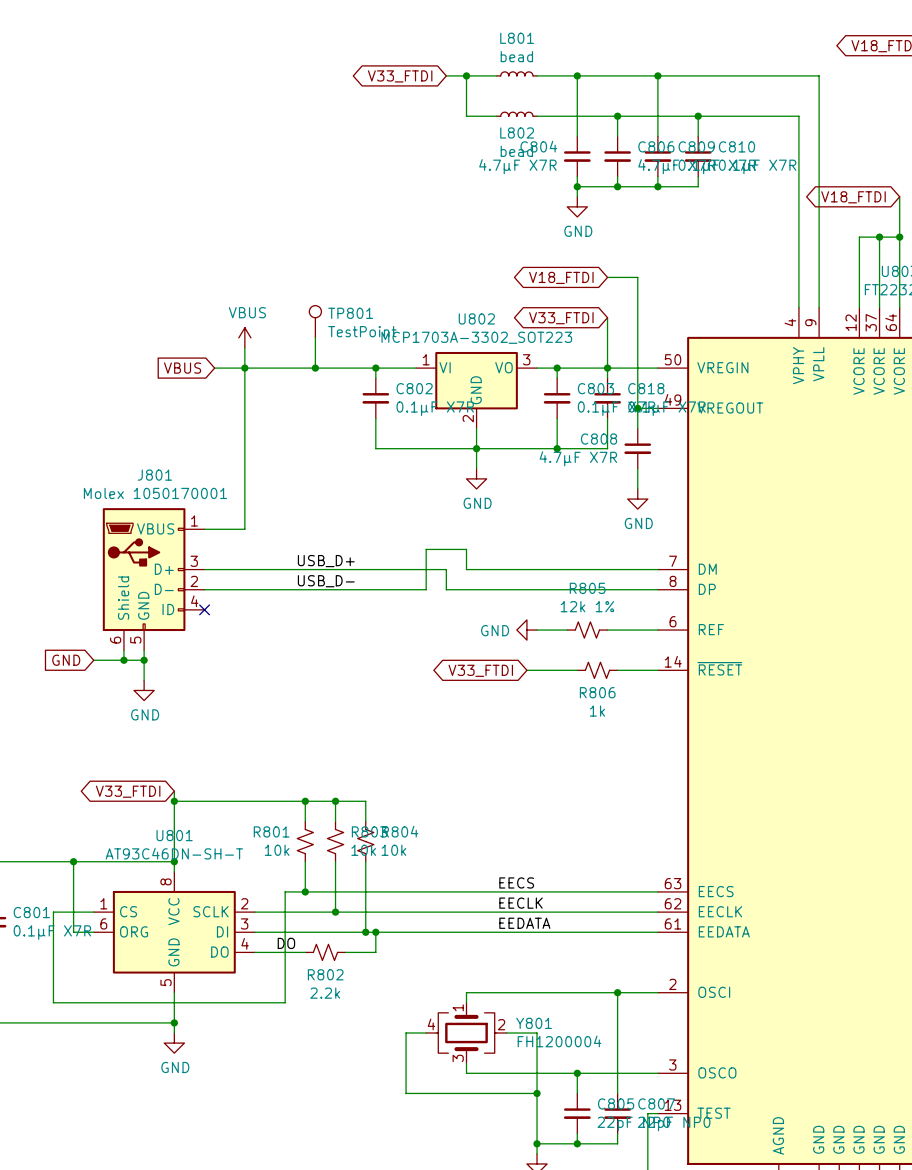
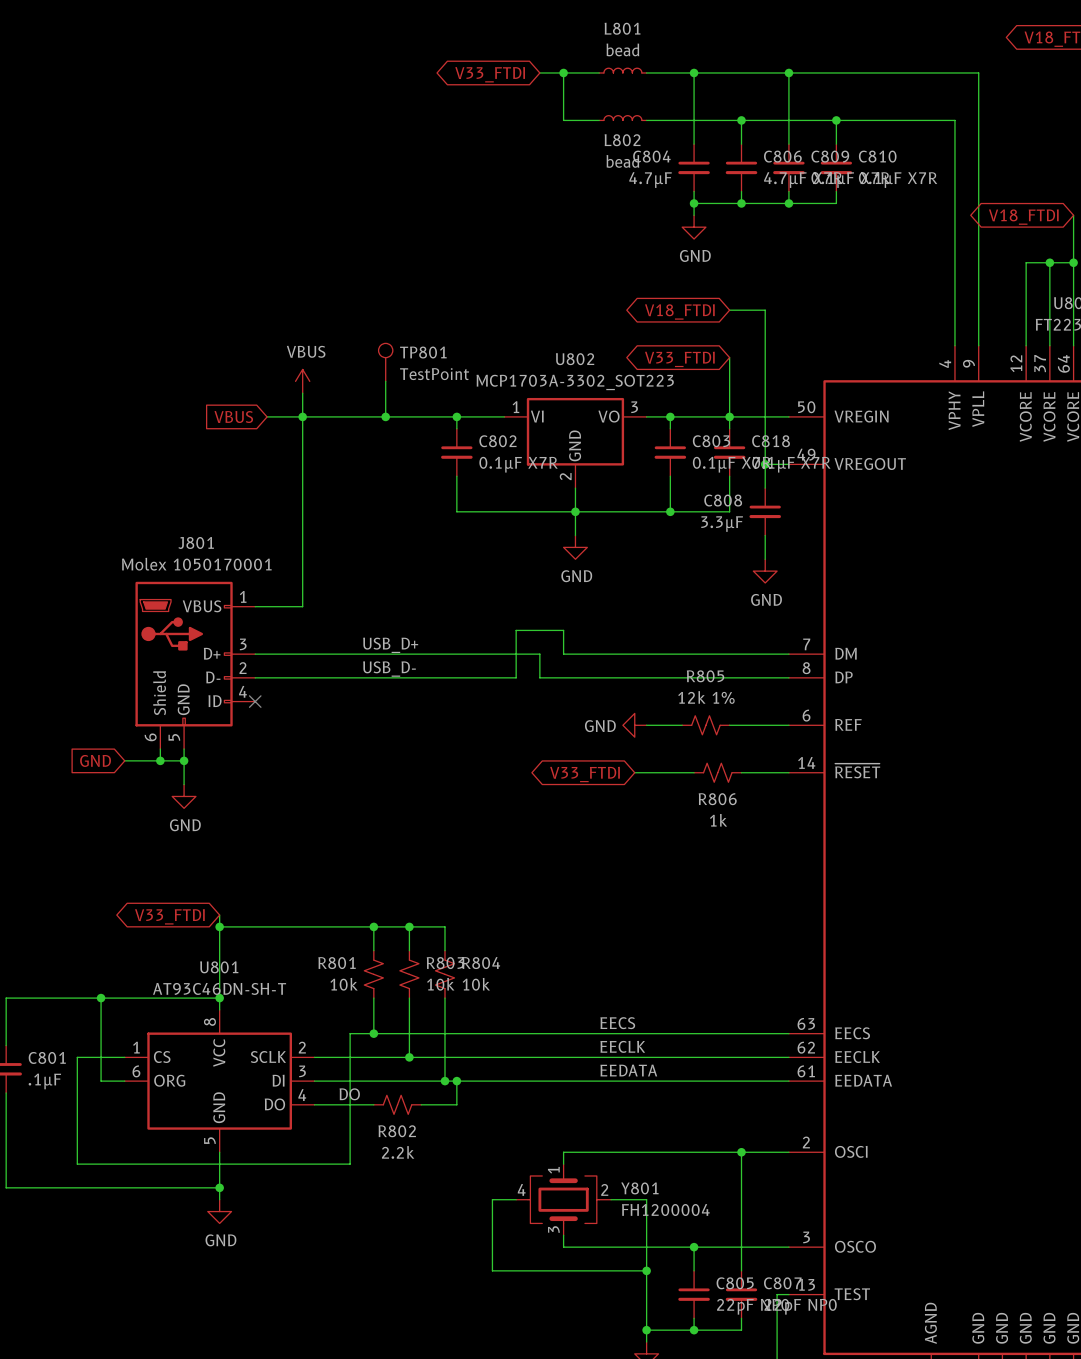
C804 value: 4.7µF X7R (517, 166) -> 4.7µF (650, 180)
C808 value: 4.7µF X7R (578, 458) -> 3.3µF (722, 524)
C801 value: 0.1µF X7R (52, 932) -> .1µF (44, 1081)

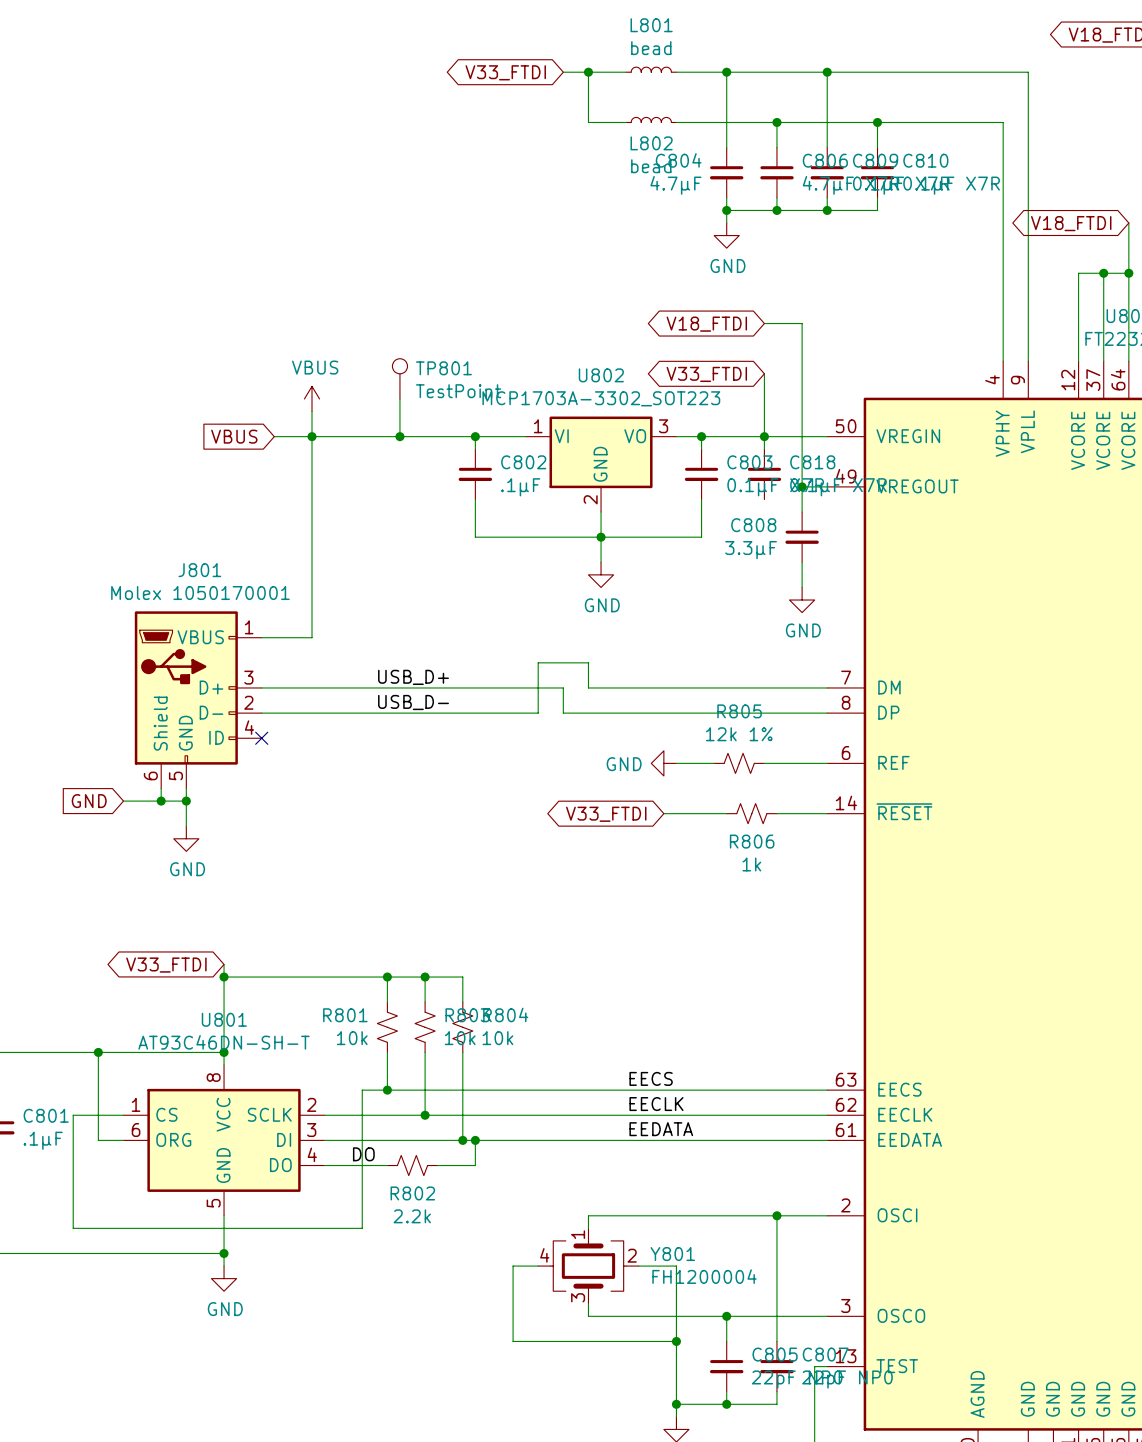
C802 value: 0.1µF X7R (518, 464) -> .1µF (520, 487)
wire: (729, 476) (729, 511) (670, 511) -> none
junction: (670, 511) -> none

